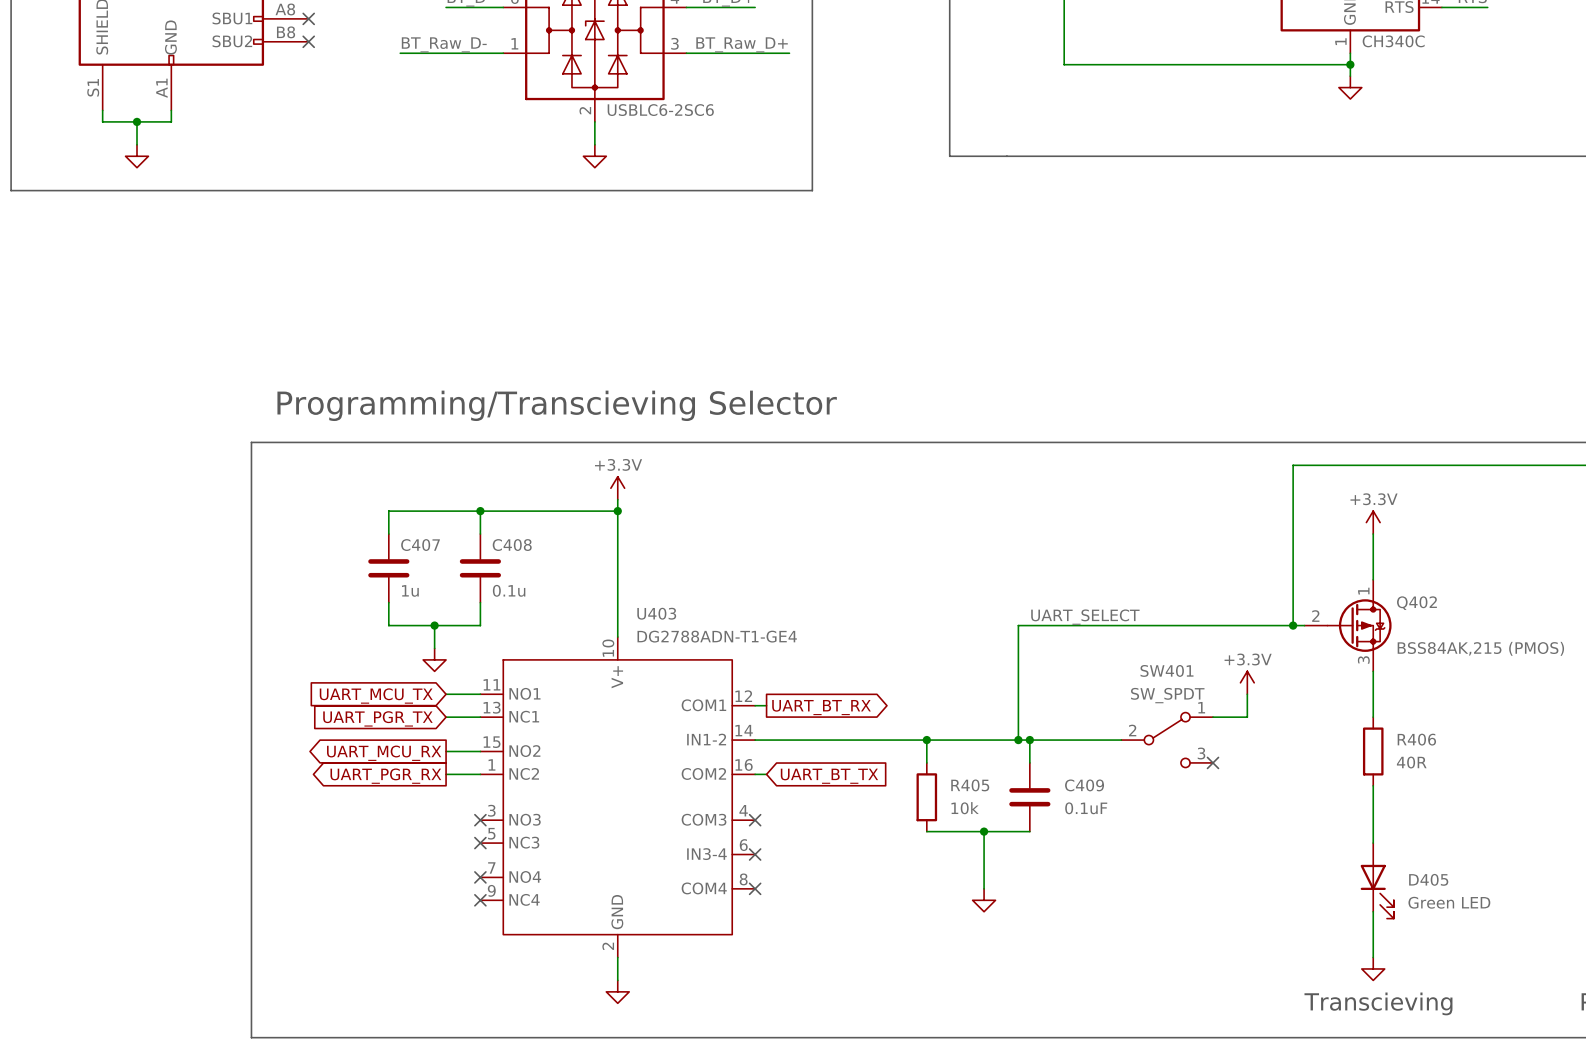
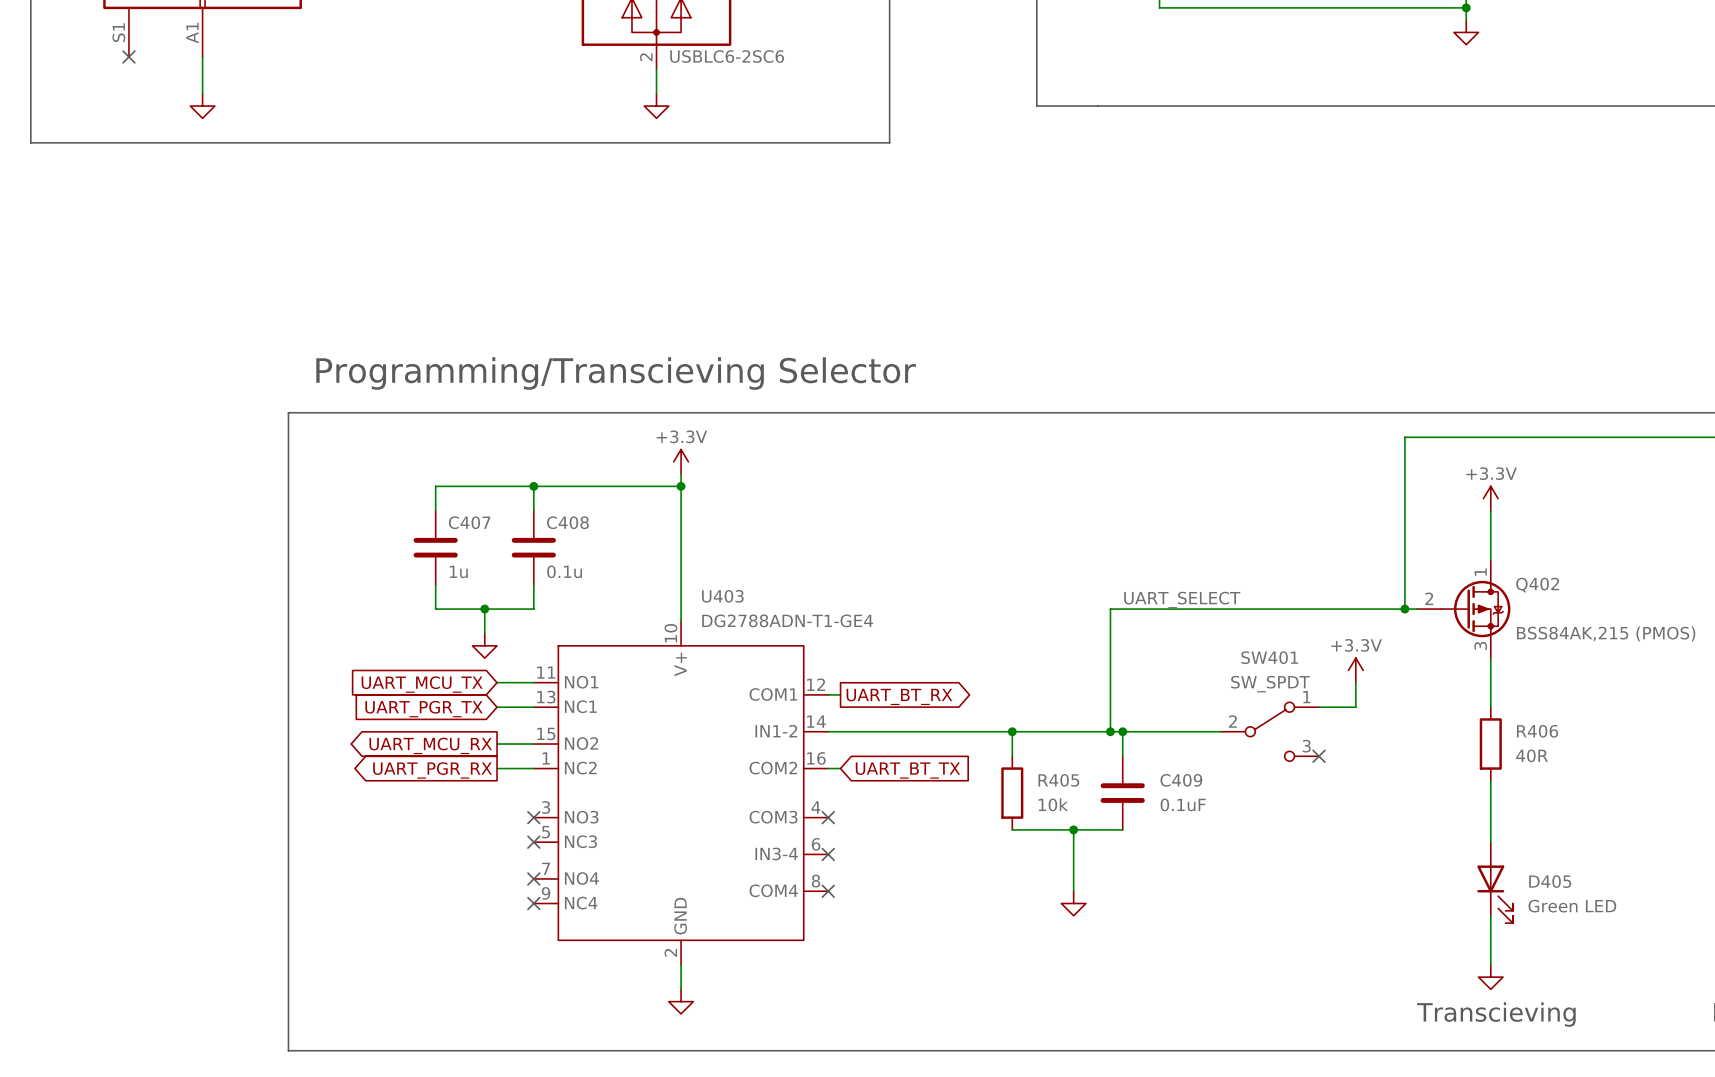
wire: (102, 110) (102, 121) (171, 121) -> (202, 93) (202, 69)
no-connect mark: none -> (128, 56)
wire: (136, 121) (136, 144) -> none
junction: (136, 121) -> none
power symbol position: (136, 156) -> (202, 106)

